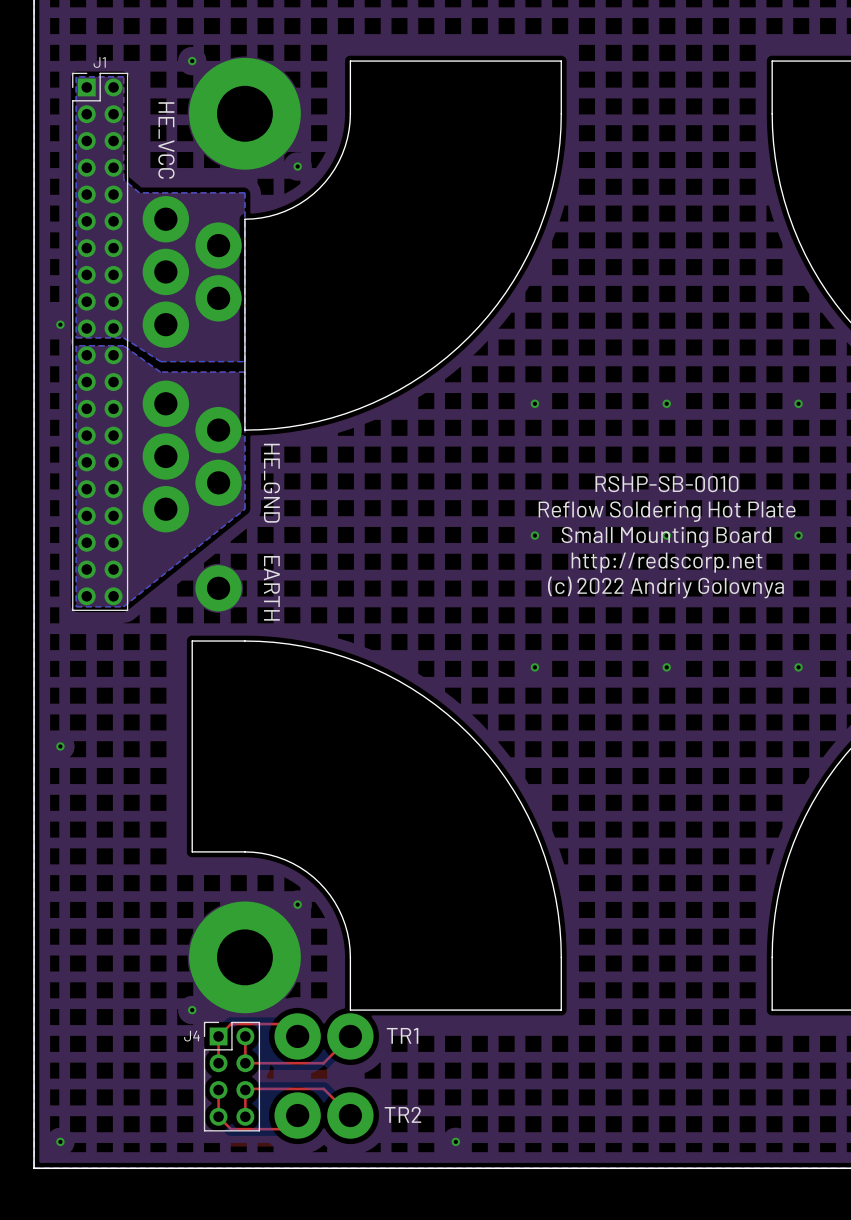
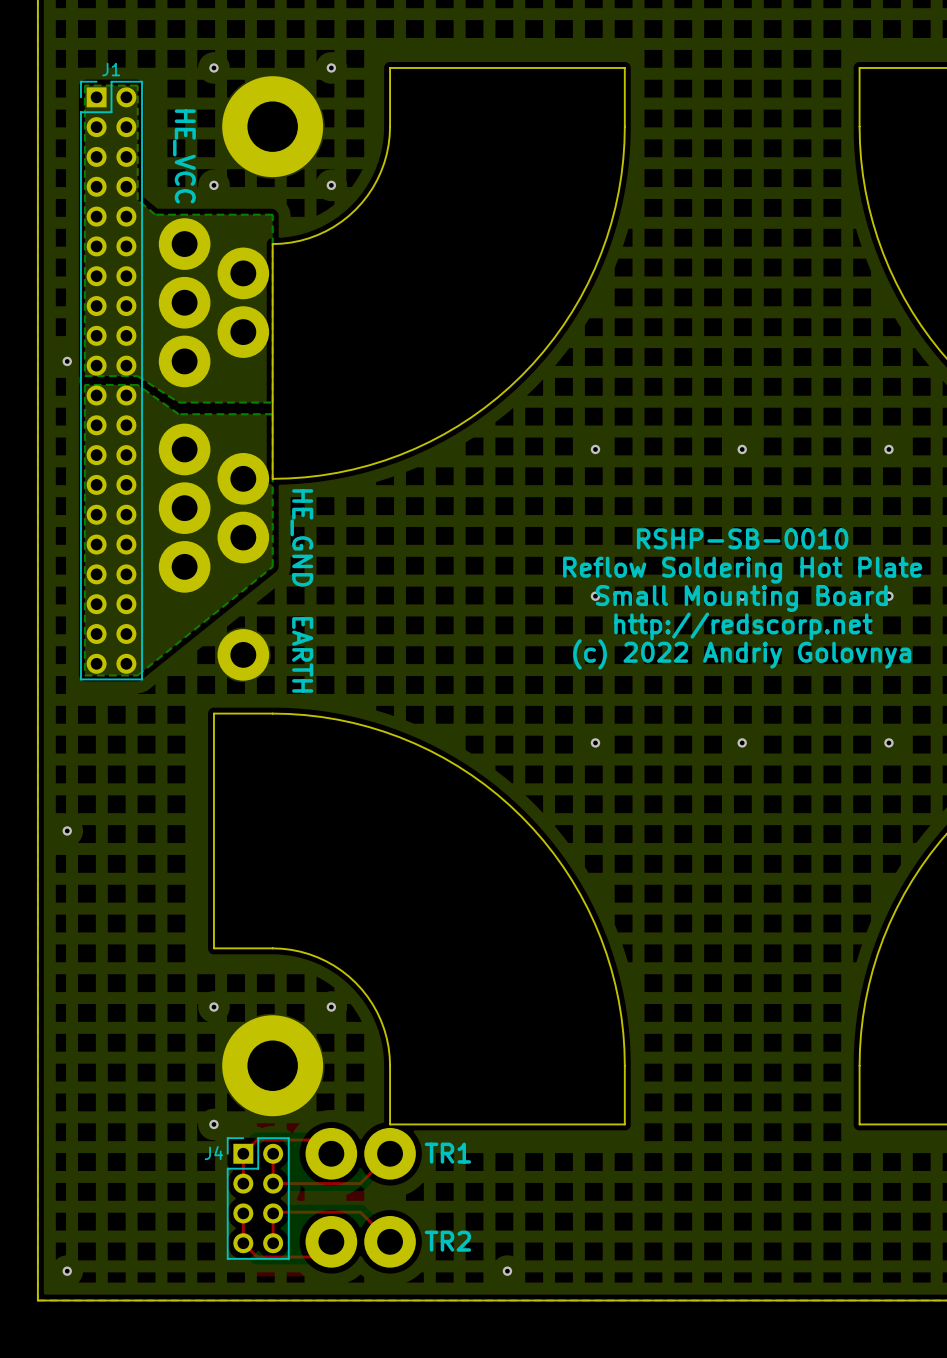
part footprint: [189, 57, 301, 170] -> [222, 76, 324, 178]
via: none -> (331, 67)
via: none -> (213, 185)
part footprint: [189, 901, 301, 1014] -> [222, 1015, 324, 1117]
via: none -> (213, 1007)

